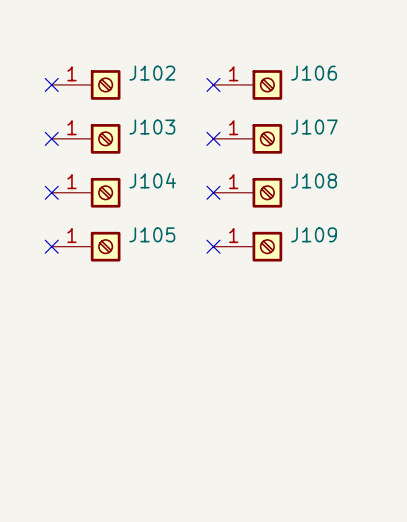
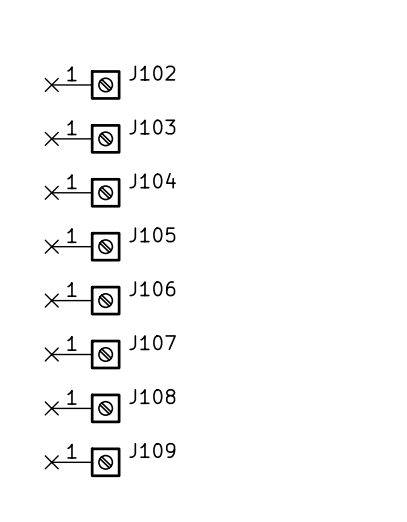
no-connect mark: (213, 84) -> none
J106 position: (247, 84) -> (86, 300)
no-connect mark: (213, 138) -> none
J107 position: (247, 138) -> (86, 354)
no-connect mark: (213, 192) -> none
J108 position: (247, 192) -> (86, 408)
no-connect mark: (213, 246) -> none
J109 position: (247, 246) -> (86, 462)
no-connect mark: none -> (51, 300)
no-connect mark: none -> (51, 354)
no-connect mark: none -> (51, 408)
no-connect mark: none -> (51, 462)

